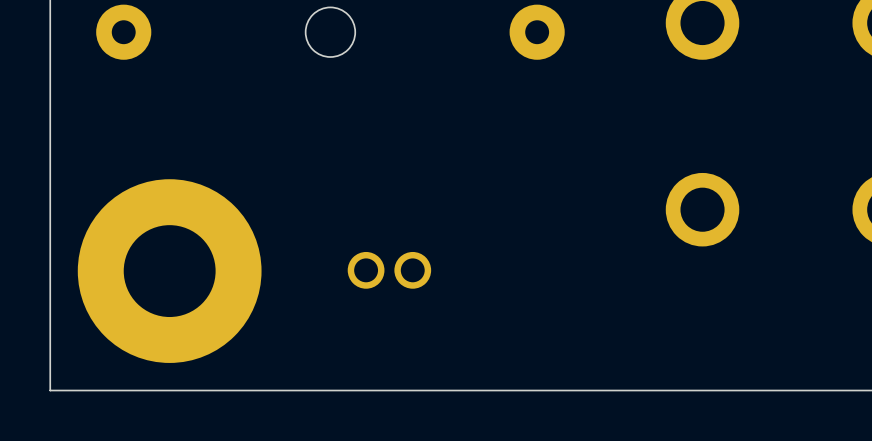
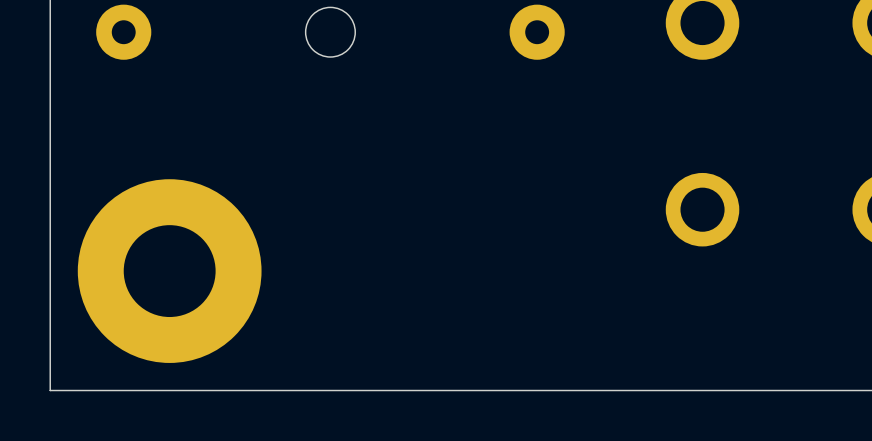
part: (389, 270) -> none

